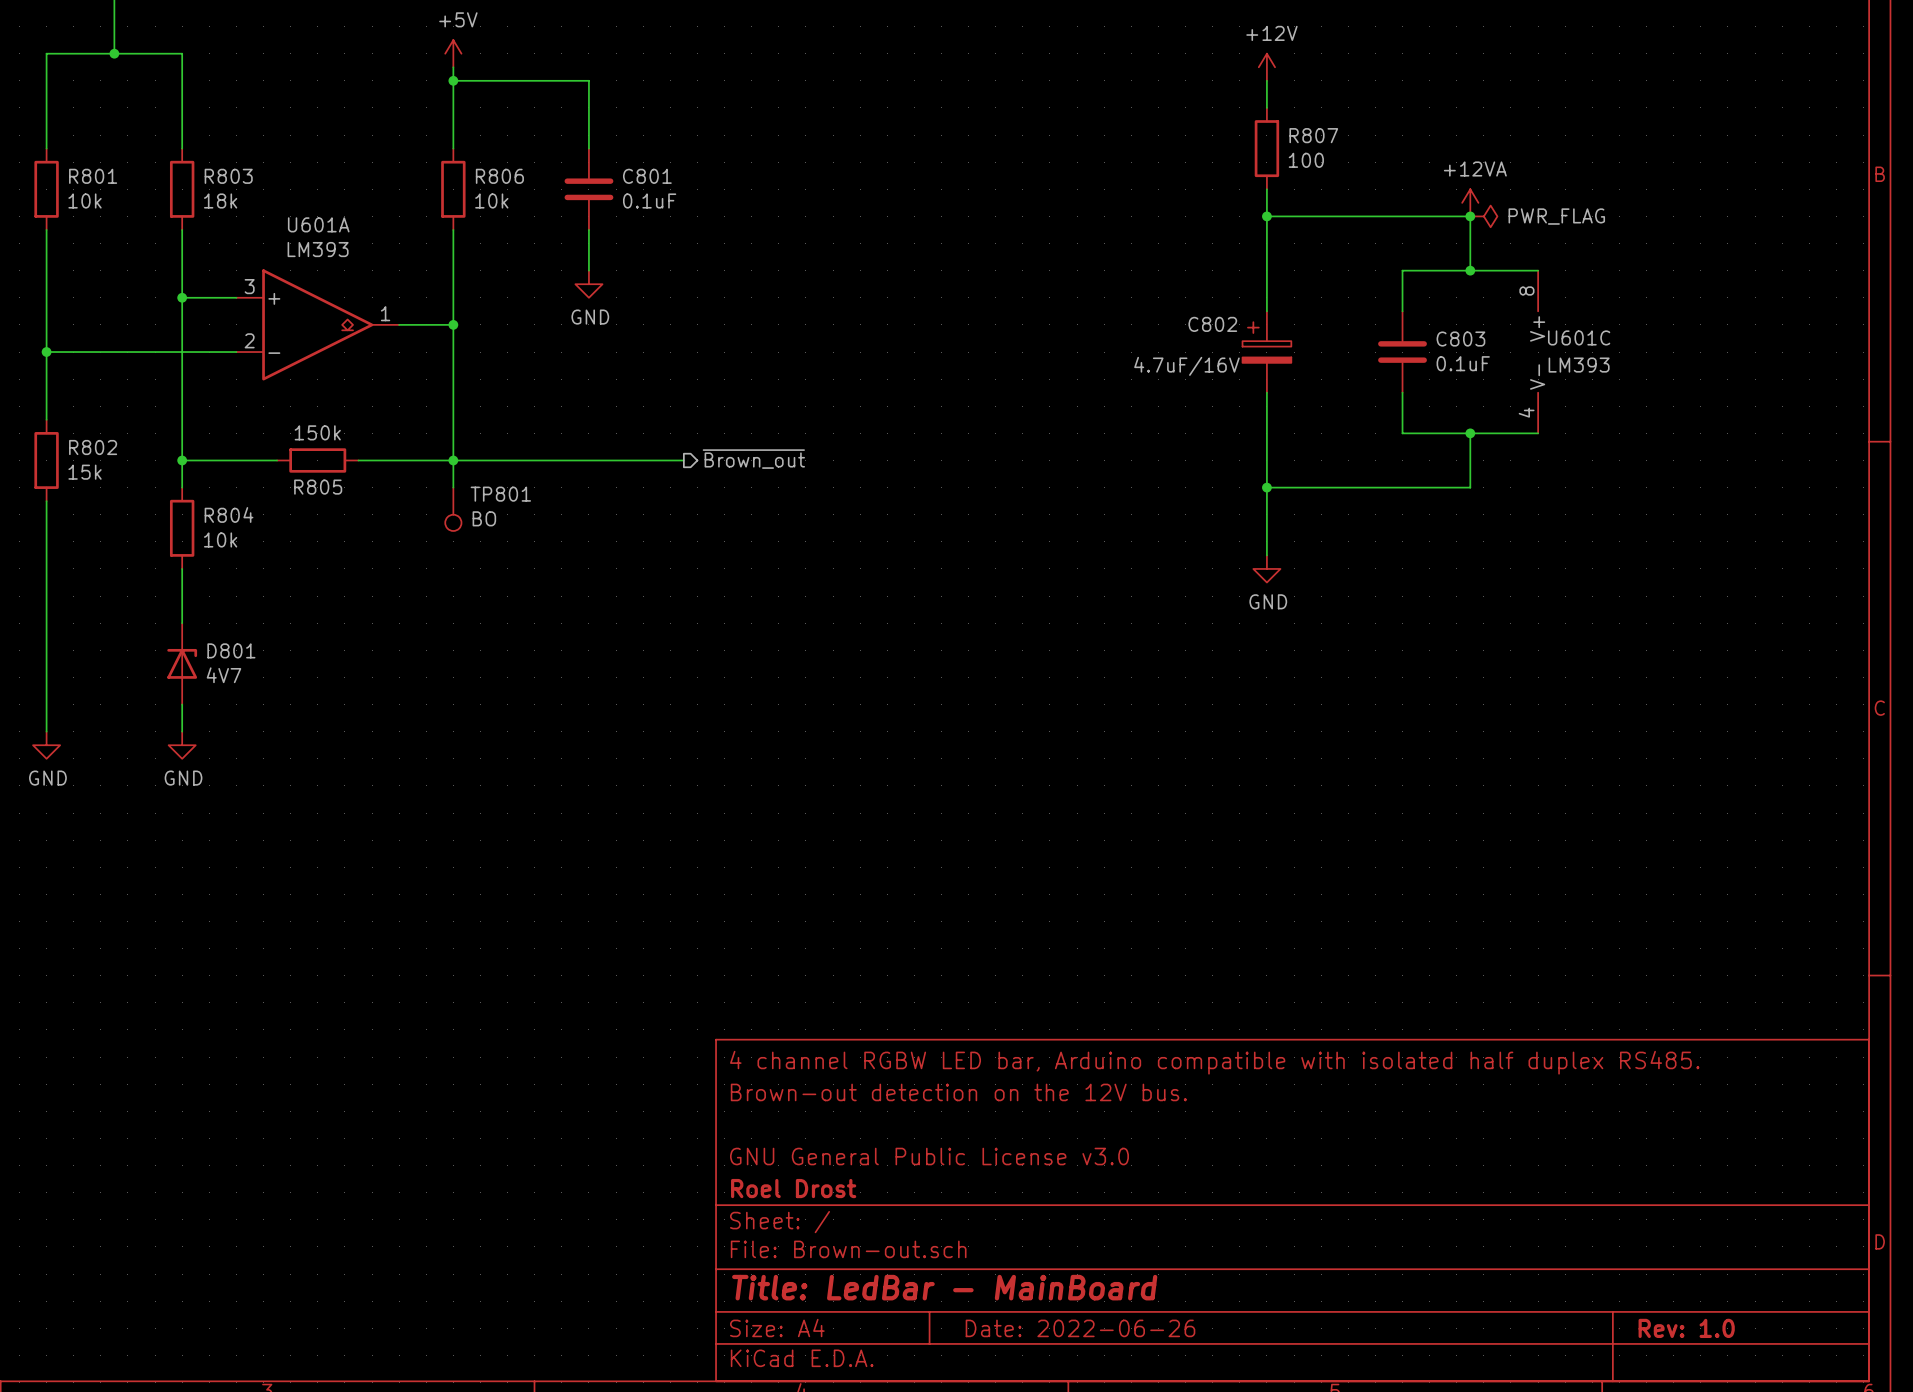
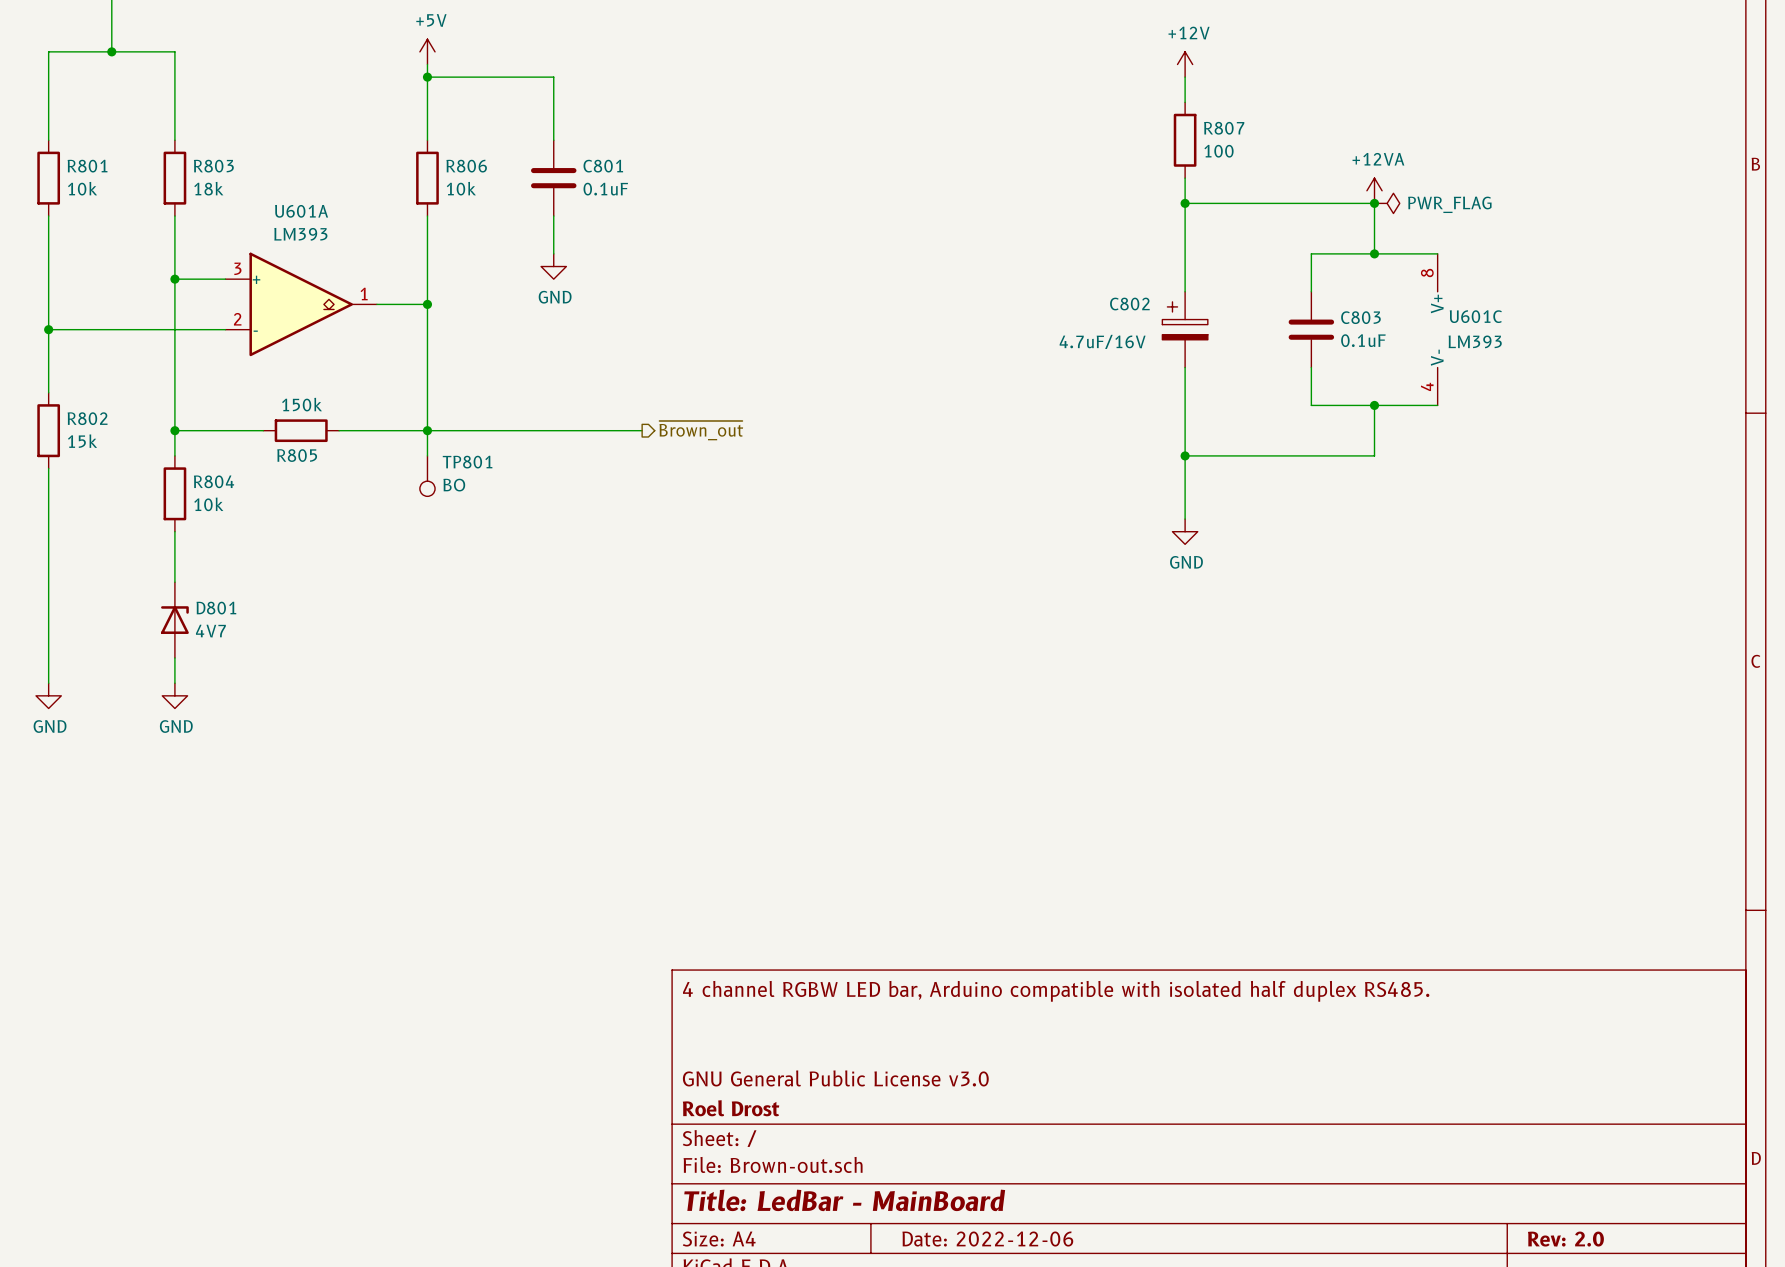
title block: Brown-out detection on the 12V bus. (958, 1092) -> none
title block: Date: 2022-06-26 (1080, 1328) -> Date: 2022-12-06 (987, 1239)
title block: Rev: 1.0 (1686, 1328) -> Rev: 2.0 (1565, 1239)

